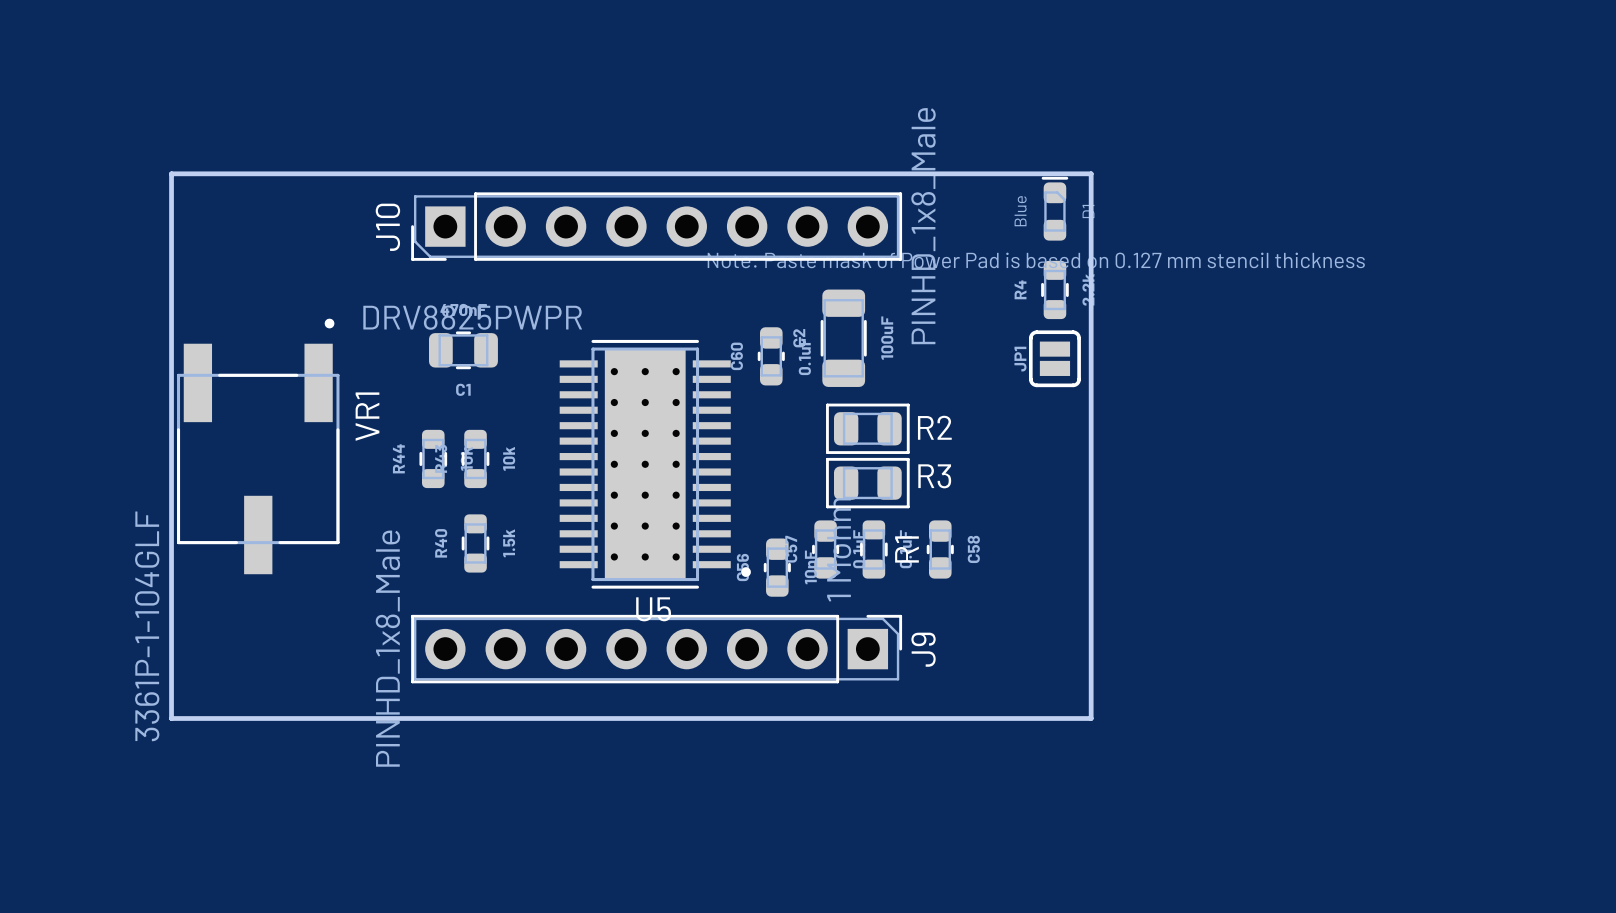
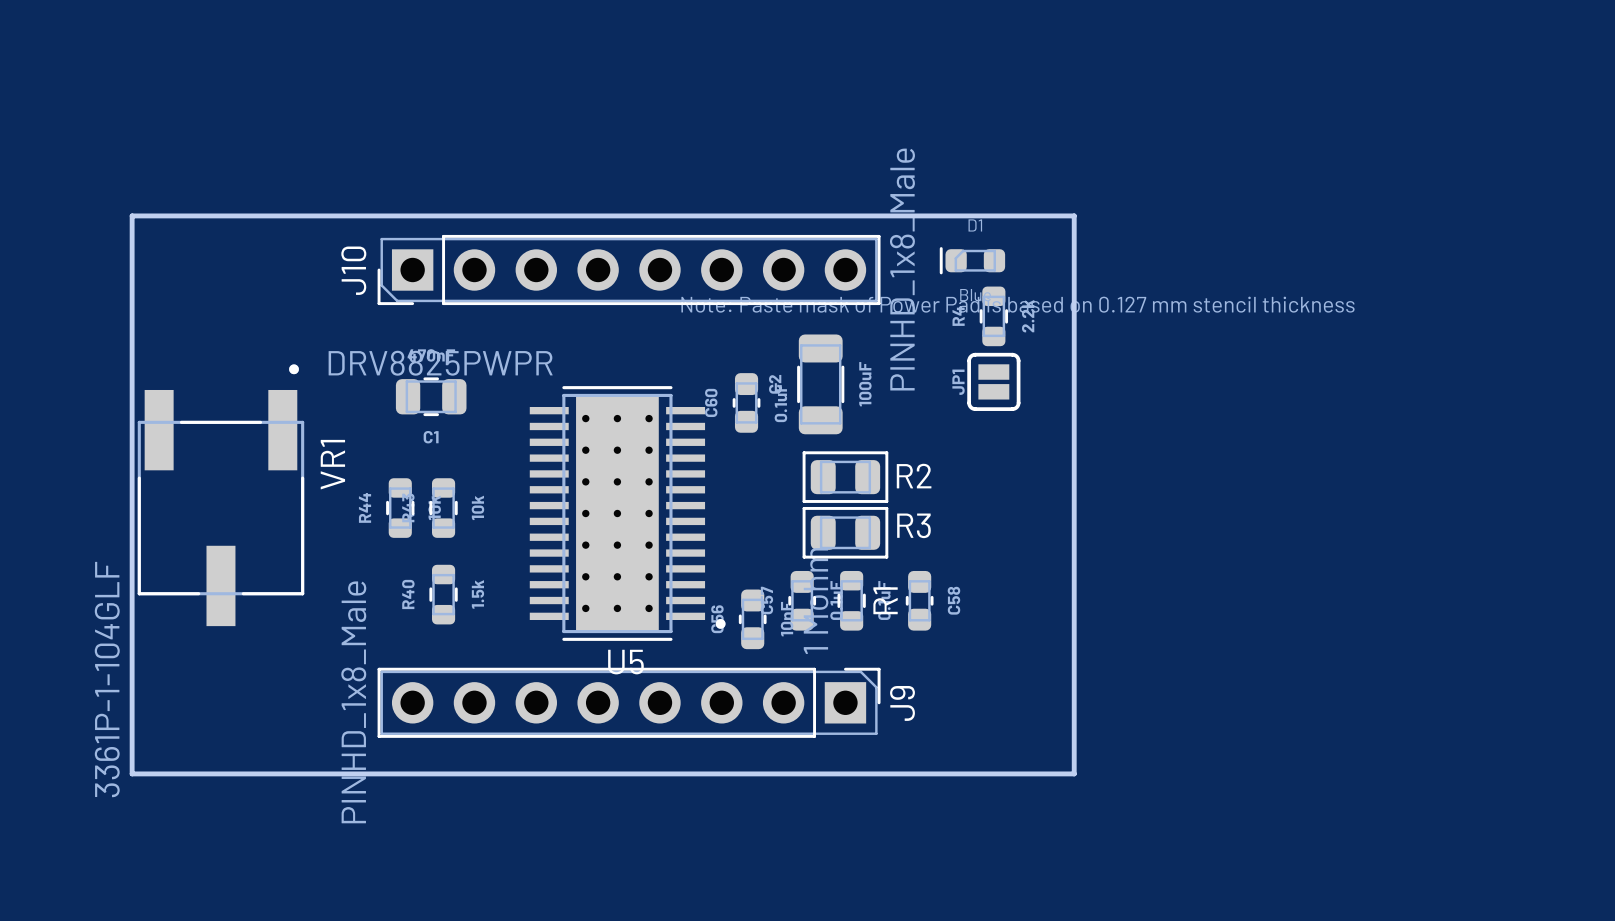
D1 rotation: 0° (1054, 208) -> 90° counterclockwise (972, 260)
D1 position: (1054, 208) -> (972, 260)
R4 position: (1054, 289) -> (993, 316)
JP1 position: (1054, 358) -> (993, 381)

